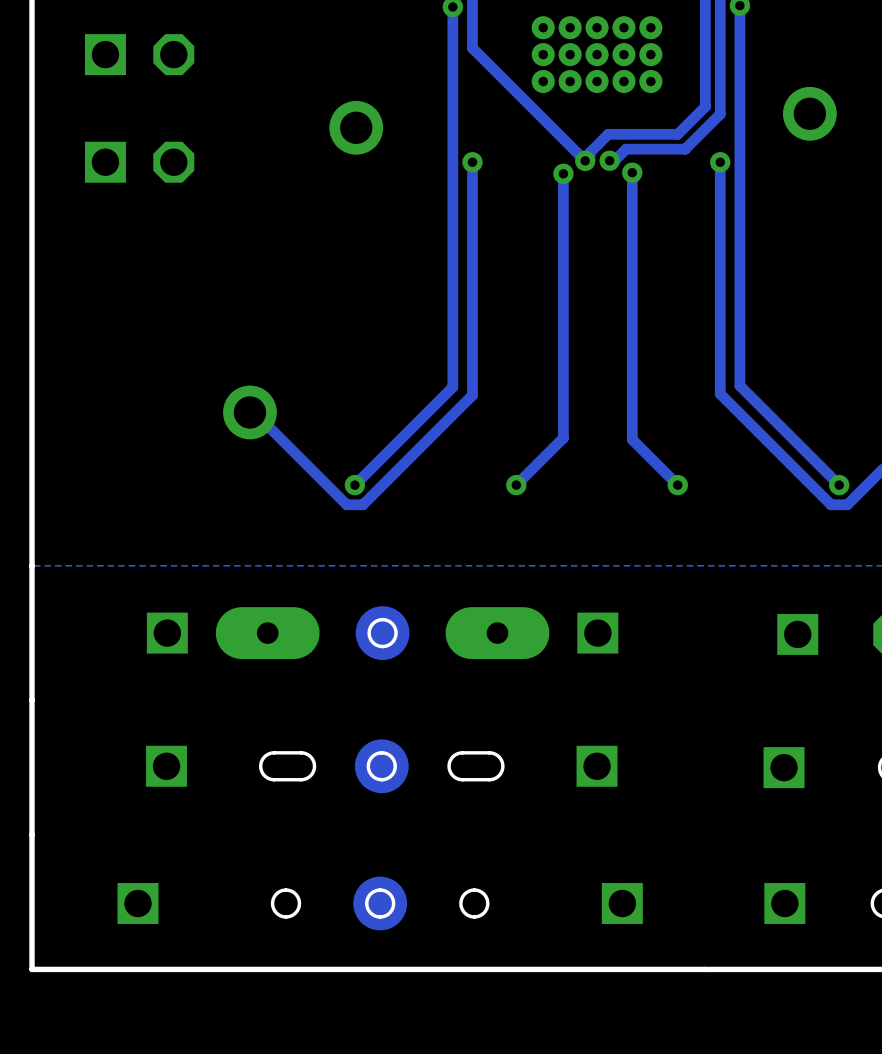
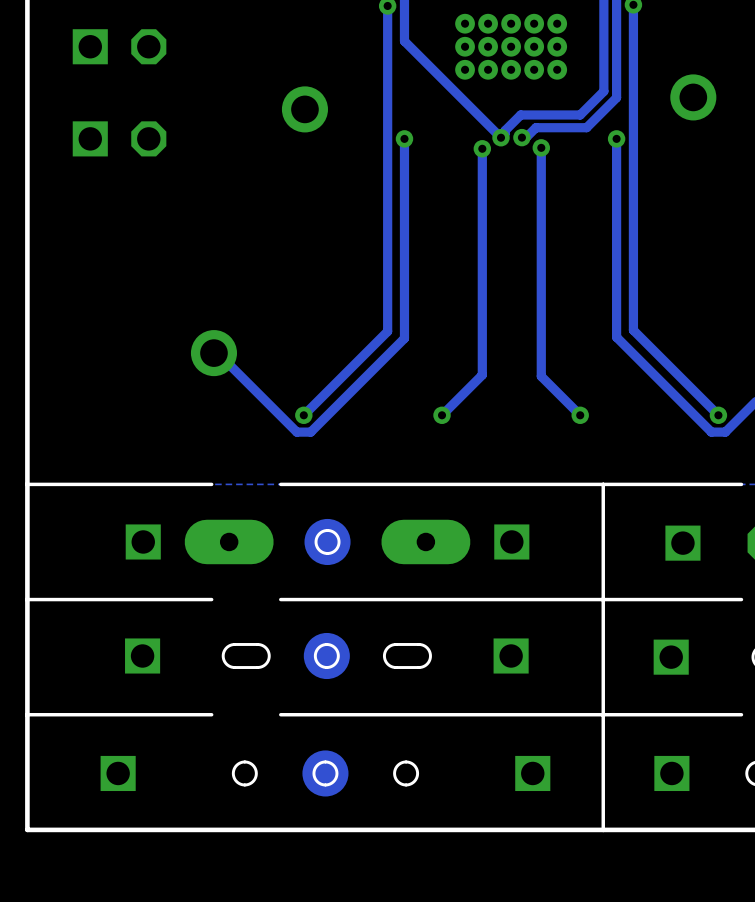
board edge: none -> (211, 484) (27, 484)
board edge: none -> (603, 484) (603, 829)
board edge: none -> (741, 484) (280, 484)
board edge: none -> (211, 599) (27, 599)
board edge: none -> (741, 599) (280, 599)
board edge: none -> (211, 714) (27, 714)
board edge: none -> (741, 714) (280, 714)

